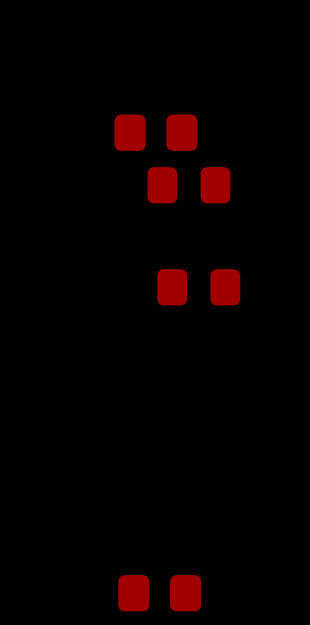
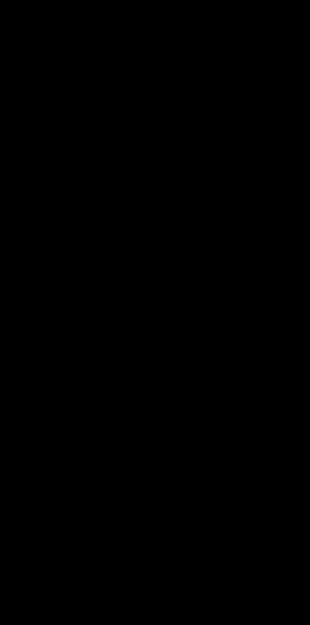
part: (156, 132) -> none
part: (188, 185) -> none
part: (198, 287) -> none
part: (159, 593) -> none

